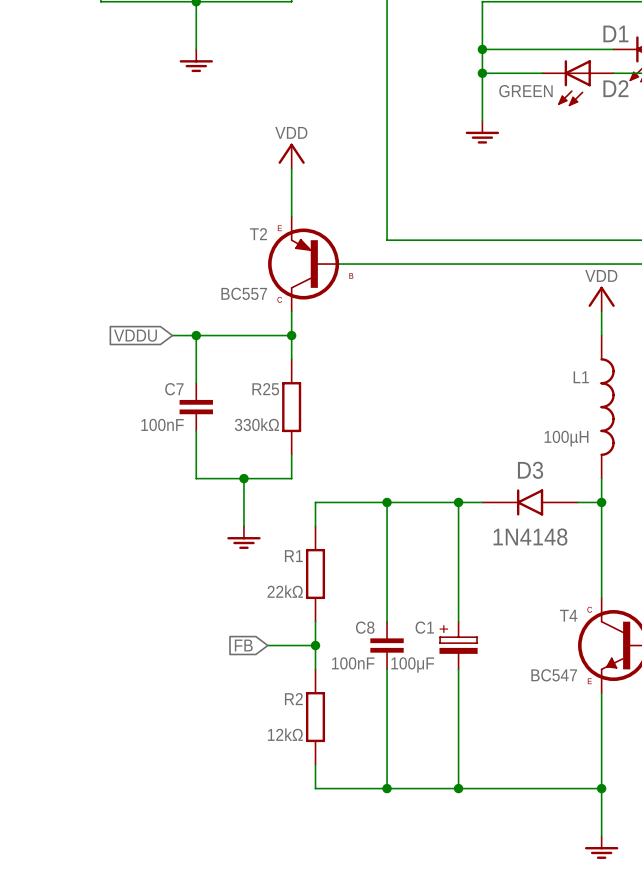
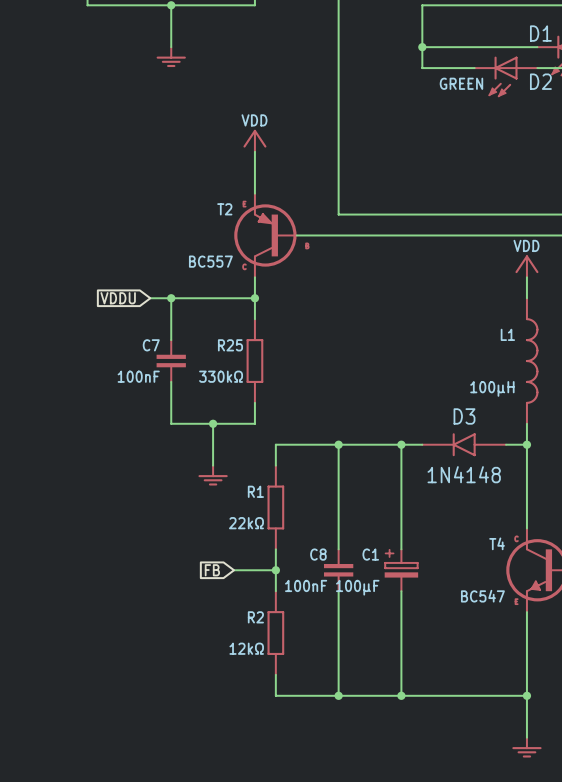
wire: (482, 73) (482, 120) -> none
junction: (482, 73) -> none
power symbol: (482, 131) -> none

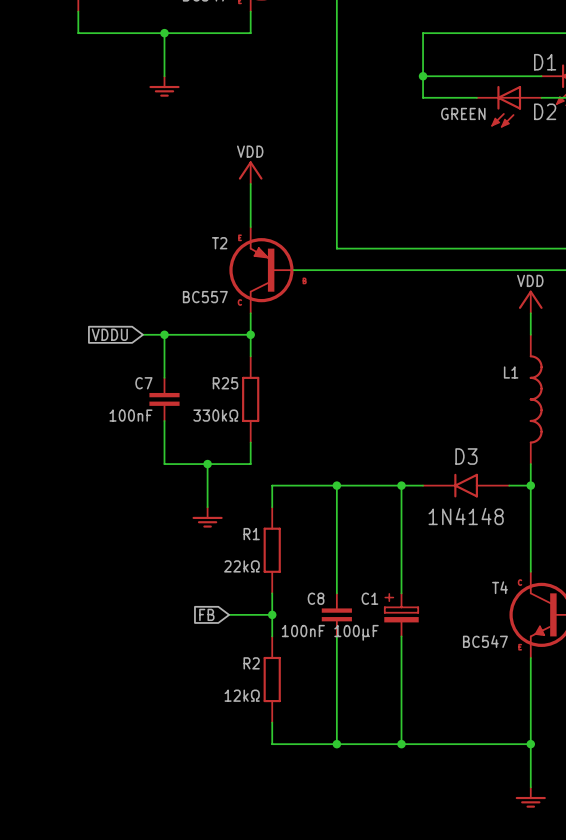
L1 value: 100µH (492, 388) -> none

